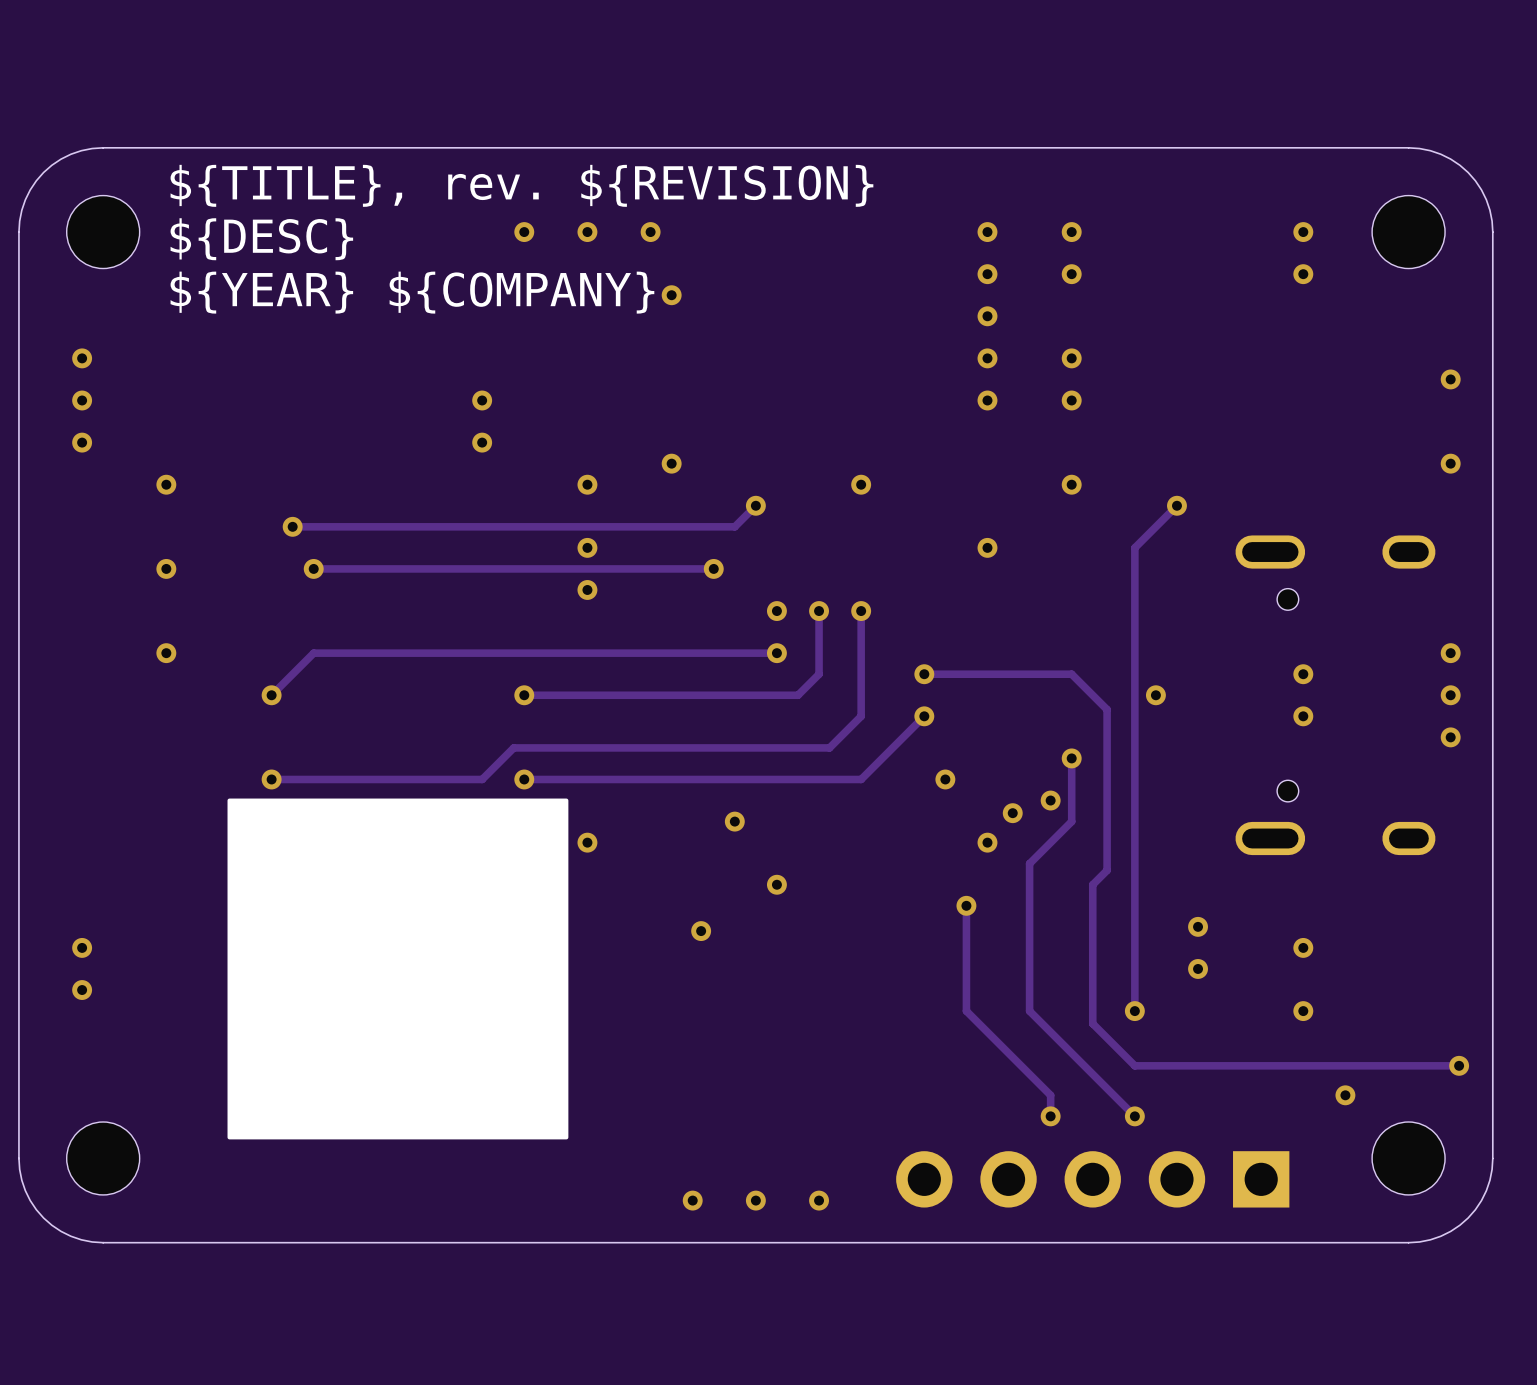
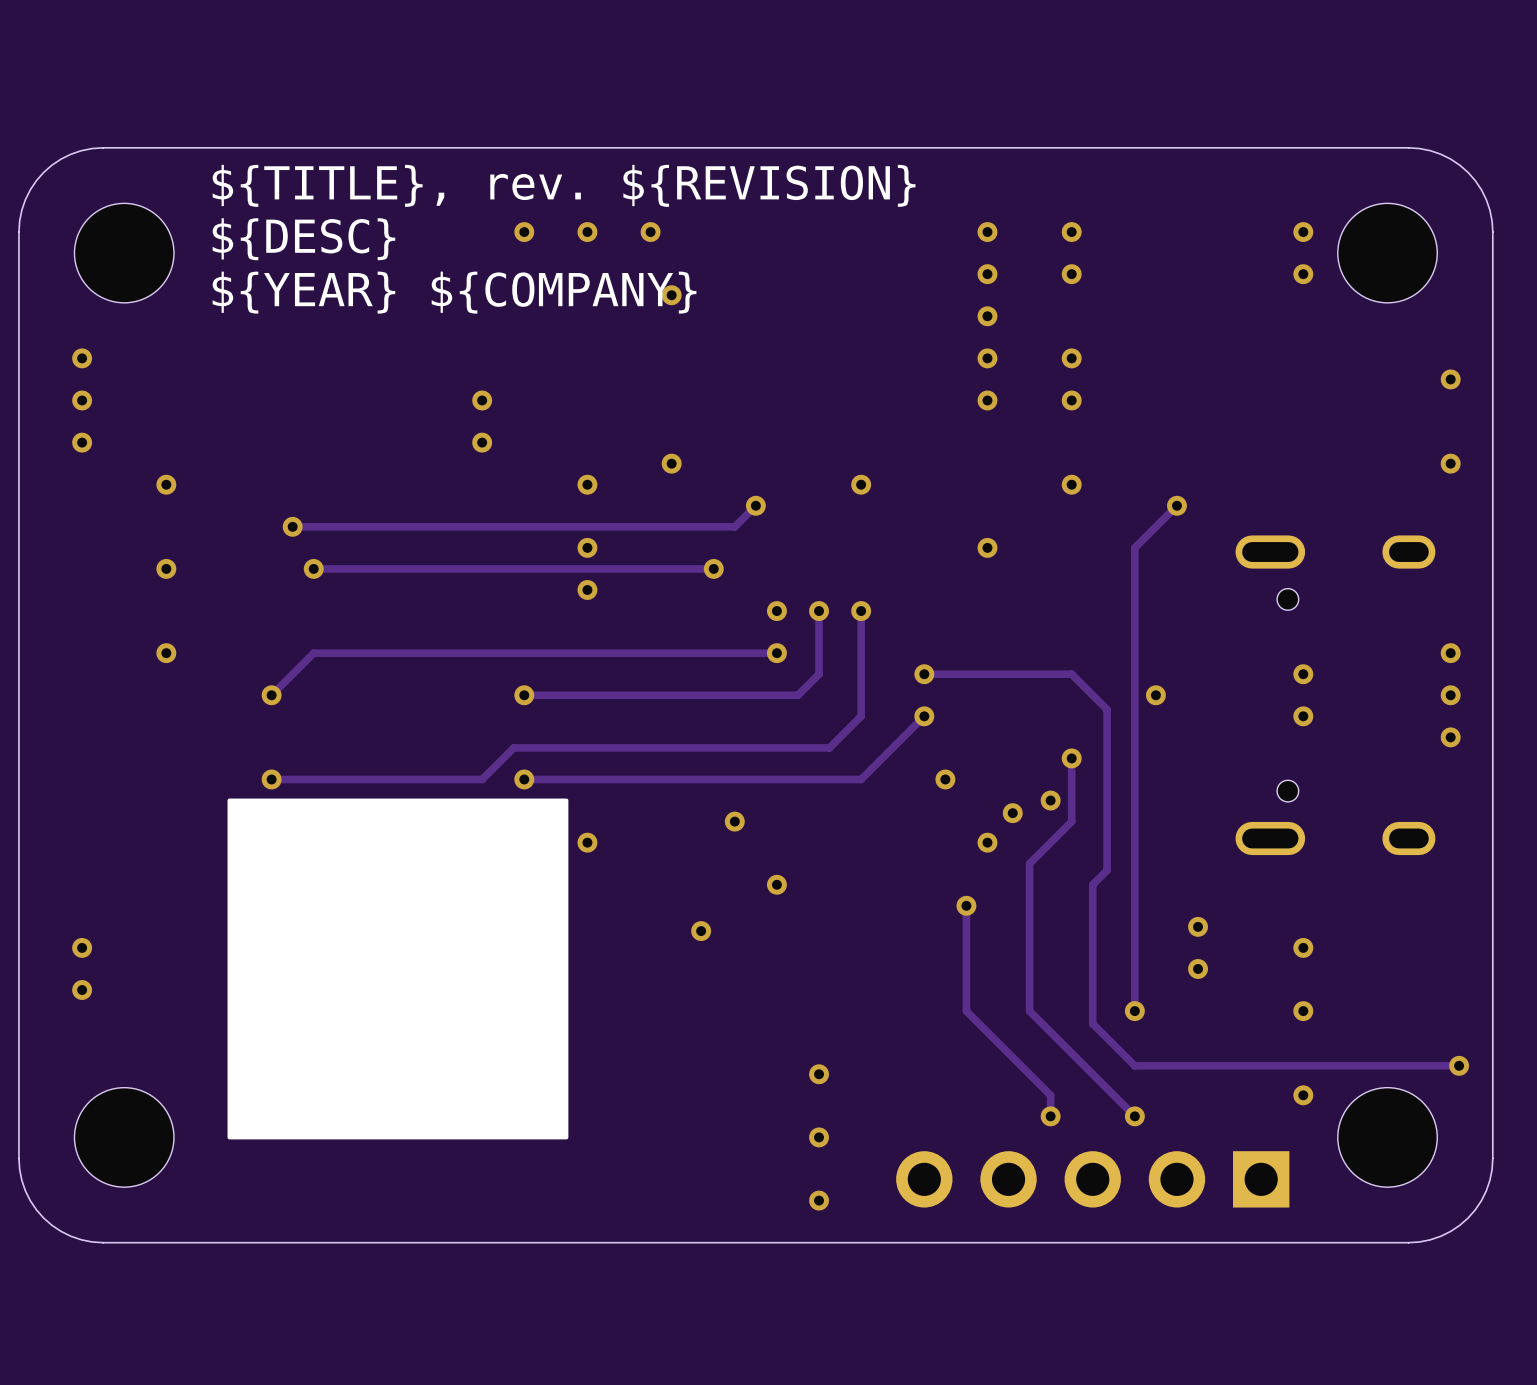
part footprint: [18, 147, 1494, 1244] -> [18, 147, 1494, 1244]
text position: ${TITLE}, rev. ${REVISION} (521, 185) -> ${TITLE}, rev. ${REVISION} (564, 185)
text position: ${DESC} (261, 239) -> ${DESC} (303, 239)
text position: ${YEAR} ${COMPANY} (412, 292) -> ${YEAR} ${COMPANY} (454, 292)
via: none -> (819, 1074)
via position: (1345, 1095) -> (1303, 1095)
via: none -> (819, 1137)
via: (692, 1200) -> none
via: (755, 1200) -> none

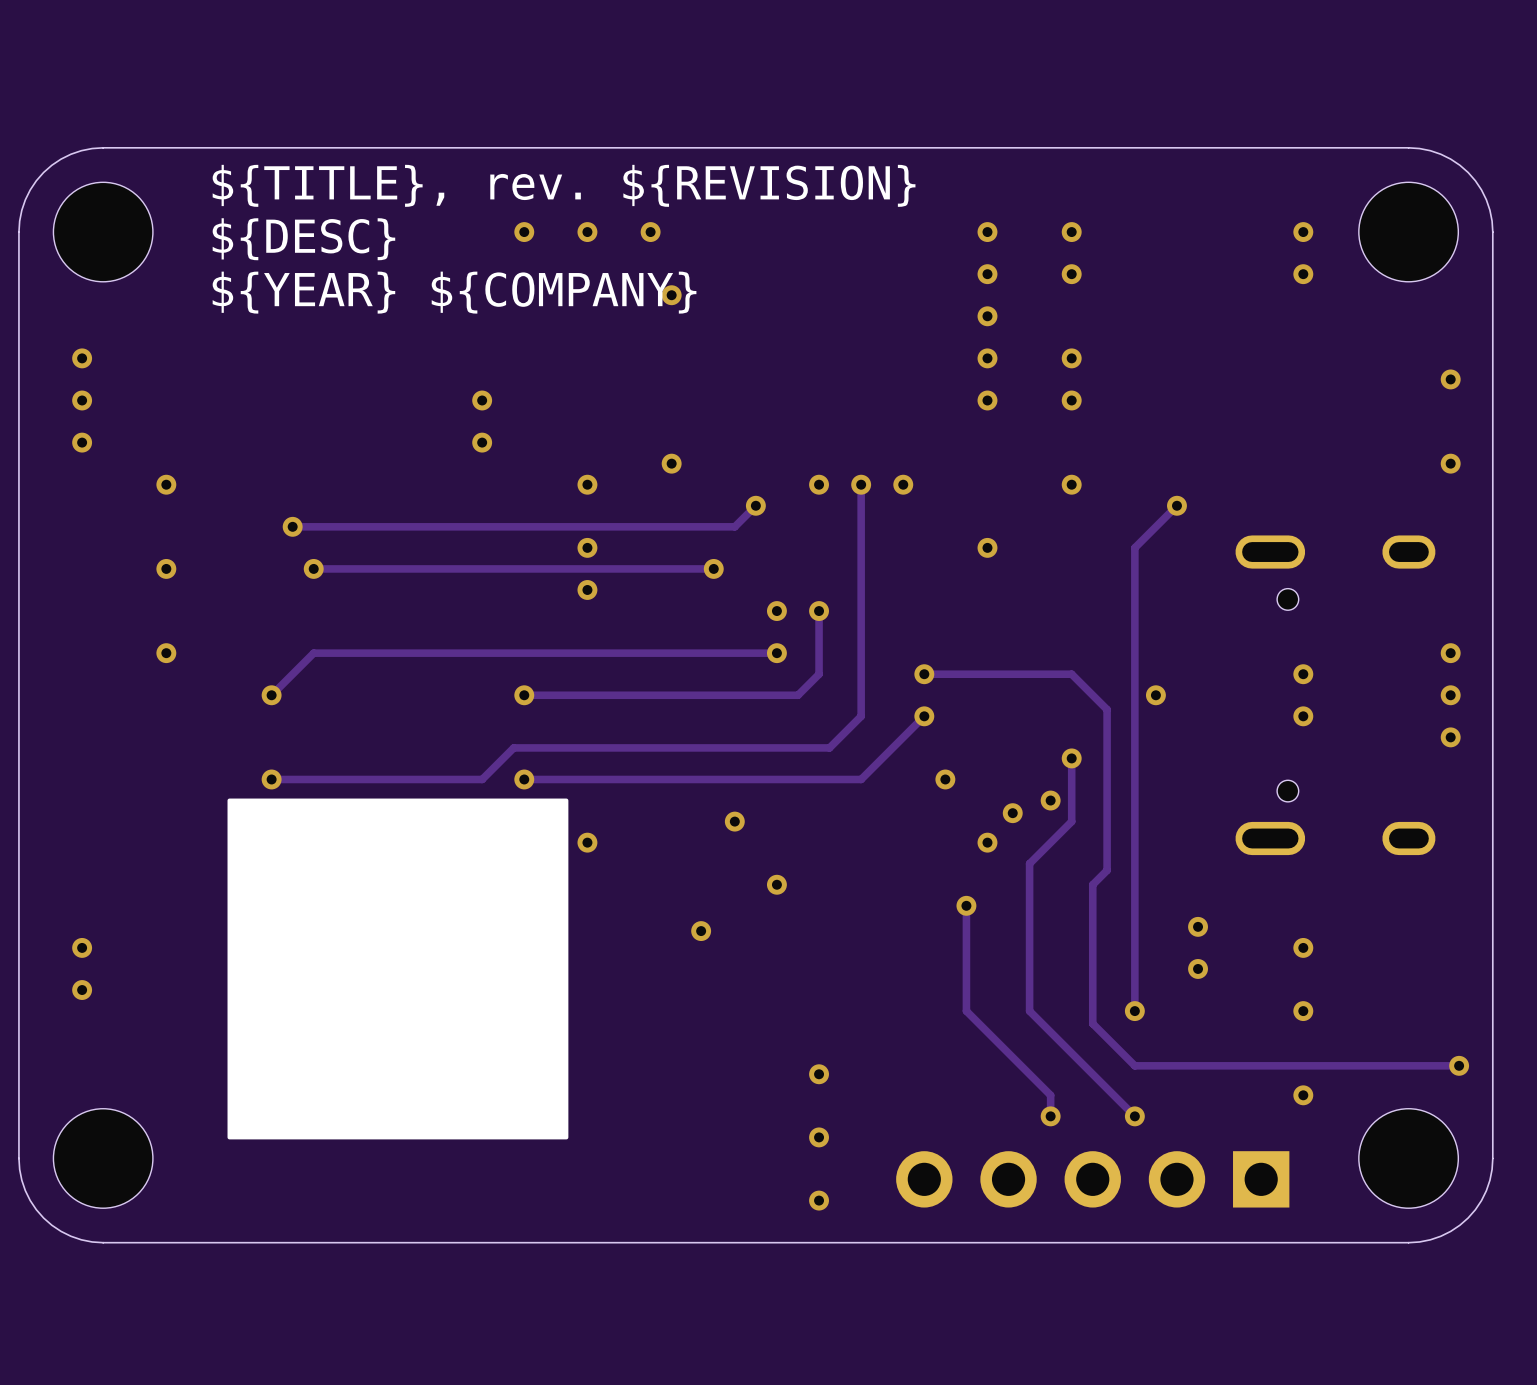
part footprint: [18, 147, 1494, 1244] -> [18, 147, 1494, 1244]
via: none -> (819, 484)
track: none -> (861, 484) (861, 611)
via: none -> (903, 484)
via: (861, 611) -> none

